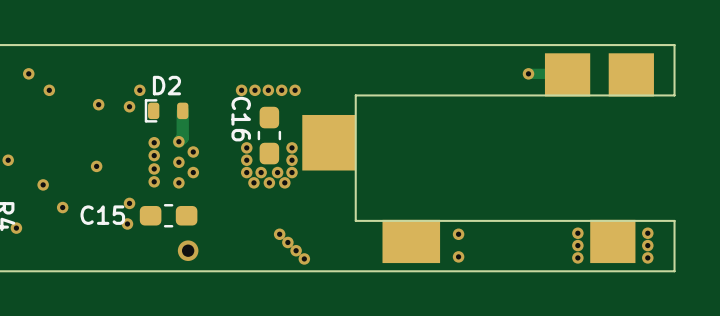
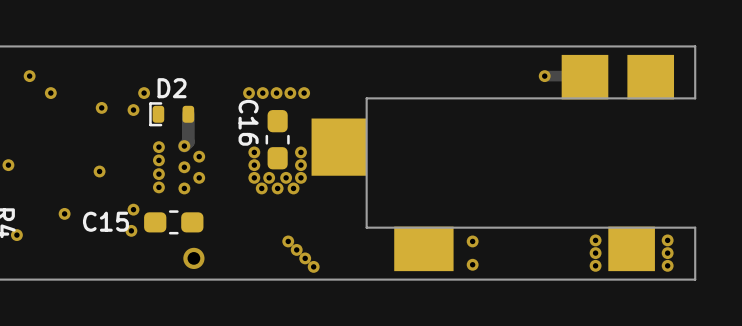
via: (43, 184) -> none

